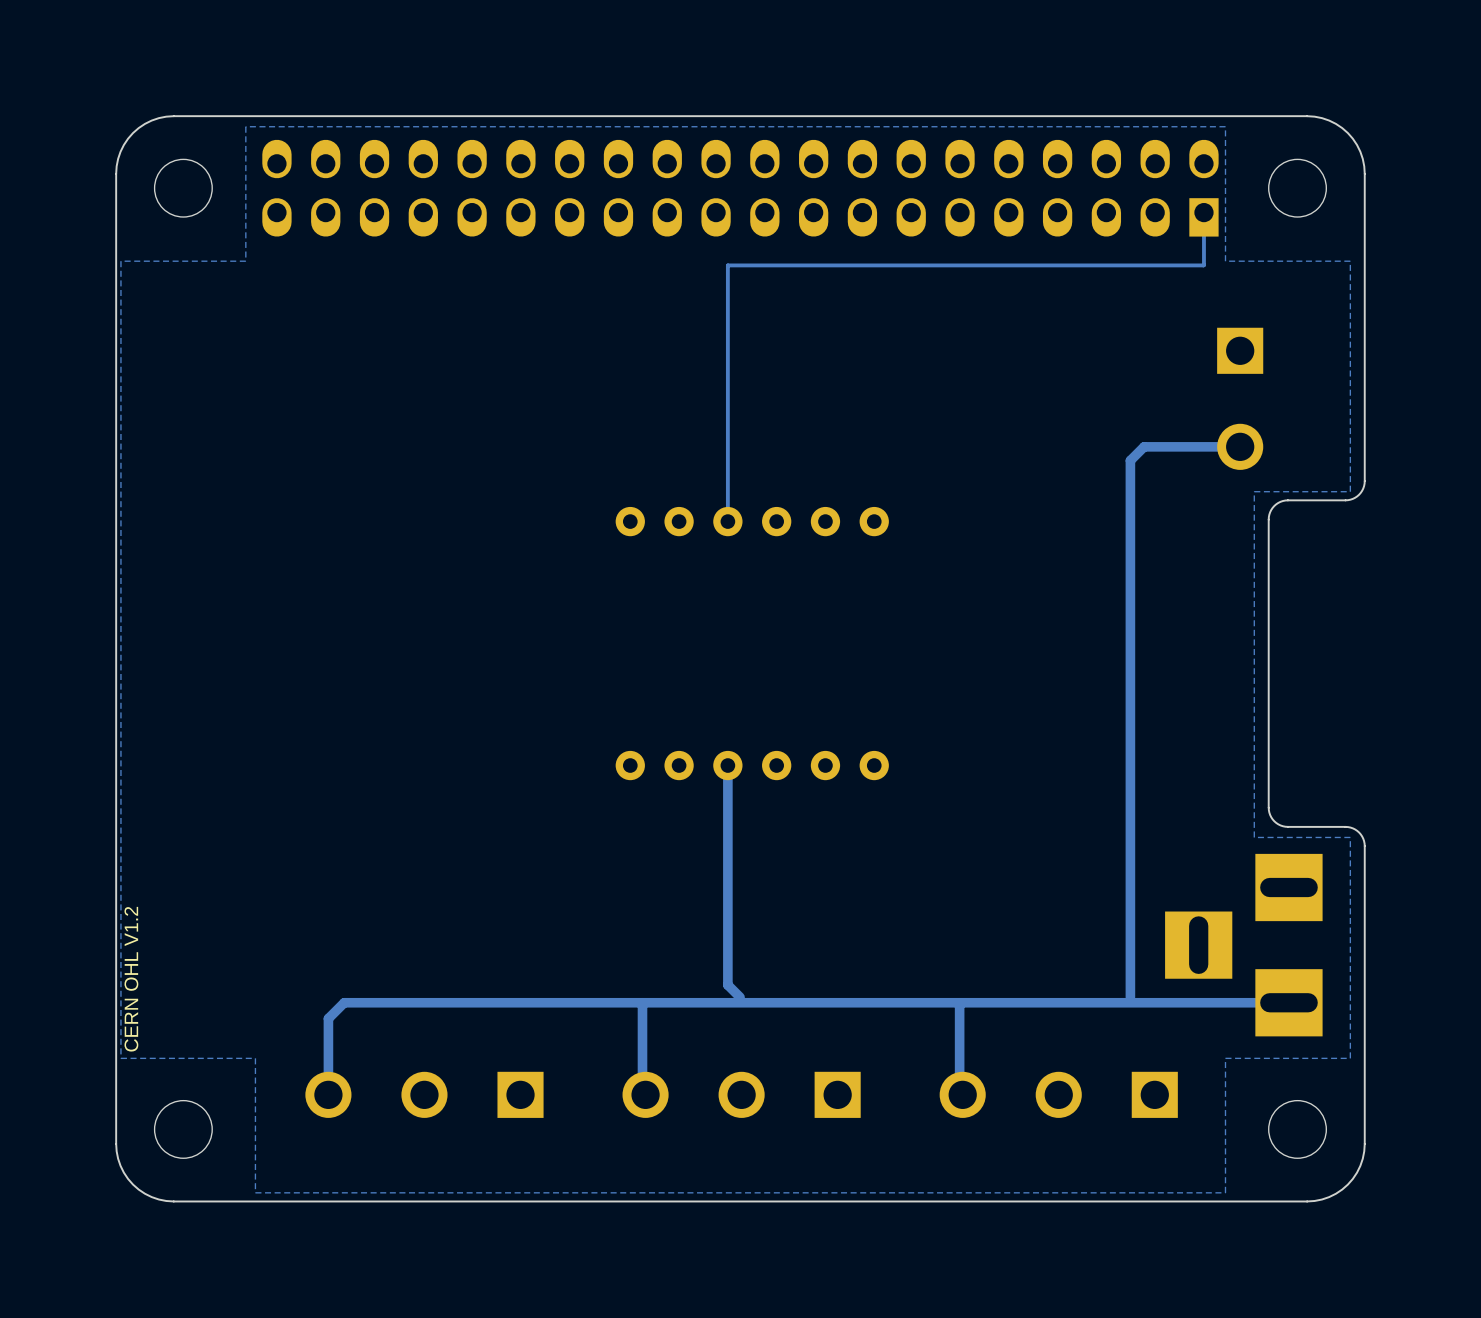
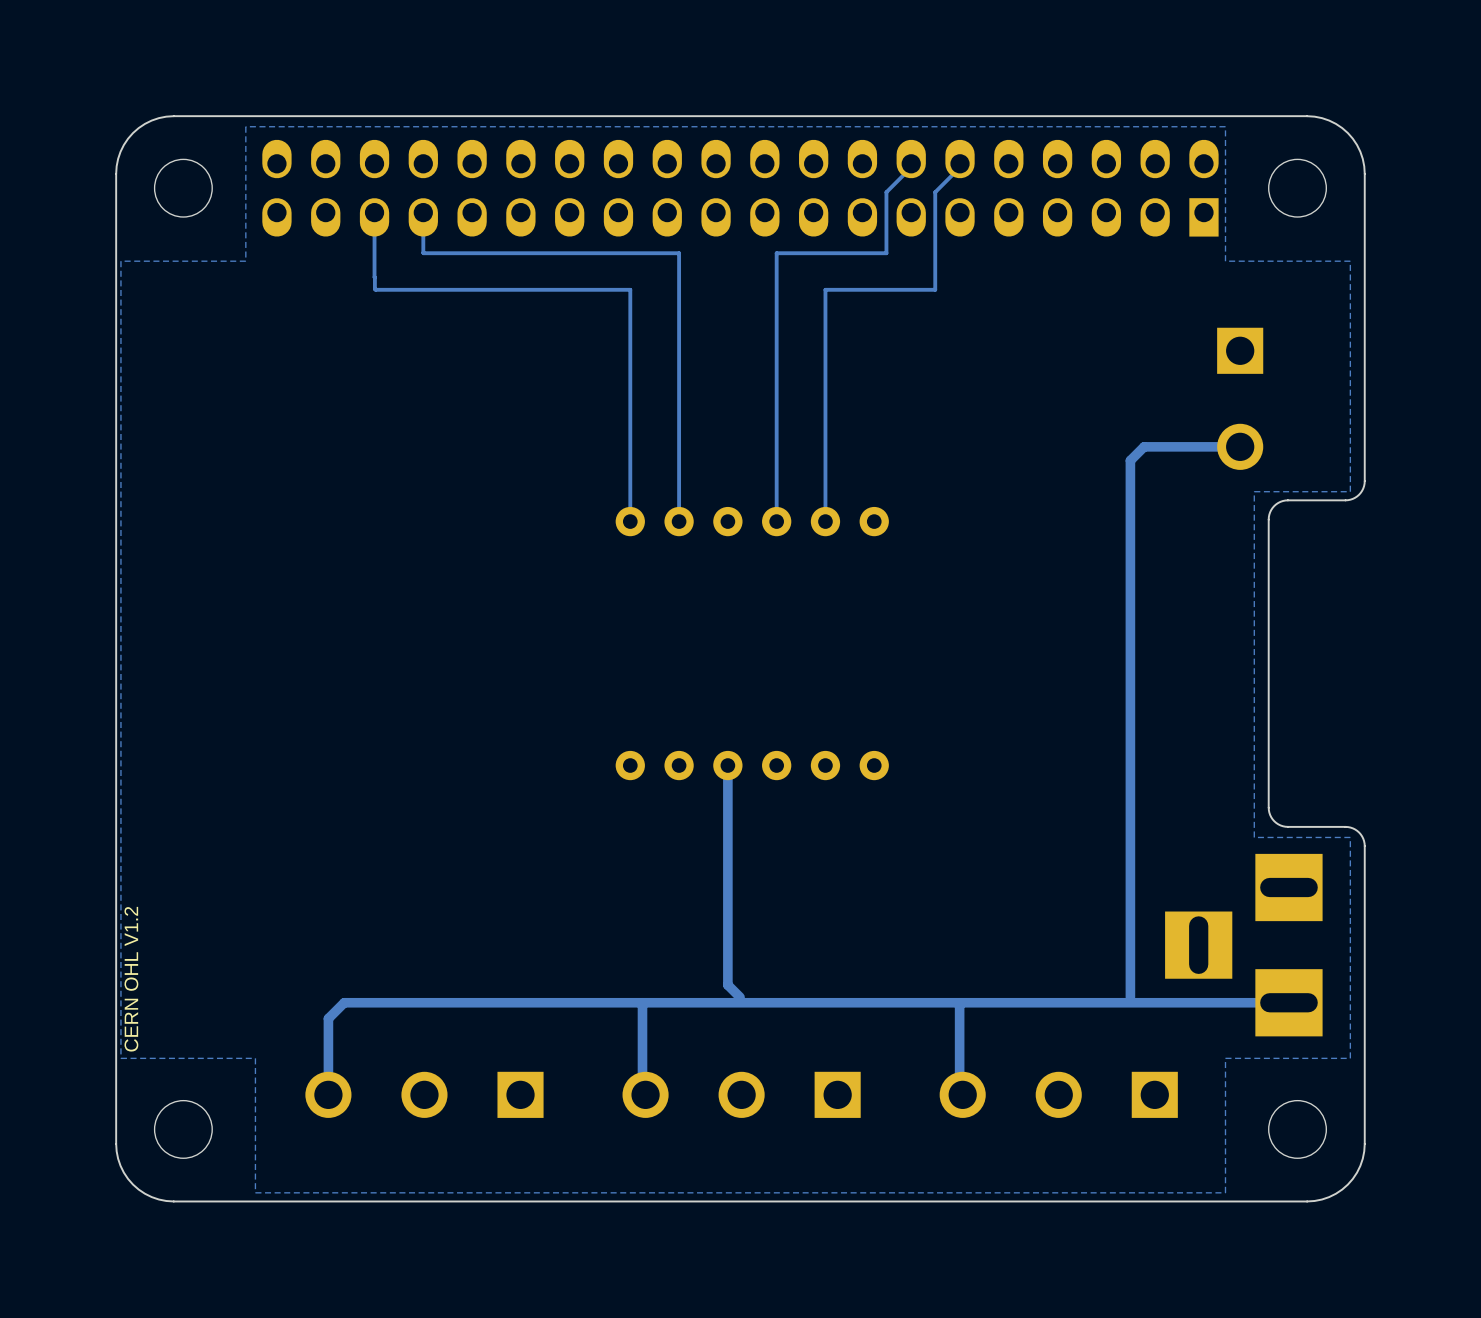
track: none -> (911, 163) (911, 167) (886, 192) (886, 253) (776, 253) (776, 521)
track: none -> (960, 163) (960, 167) (935, 192) (935, 289) (825, 289) (825, 521)
track: none -> (374, 212) (375, 289) (630, 289) (630, 521)
track: none -> (423, 212) (423, 253) (679, 253) (679, 521)
track: (1203, 212) (1203, 265) (727, 265) (727, 521) -> none

